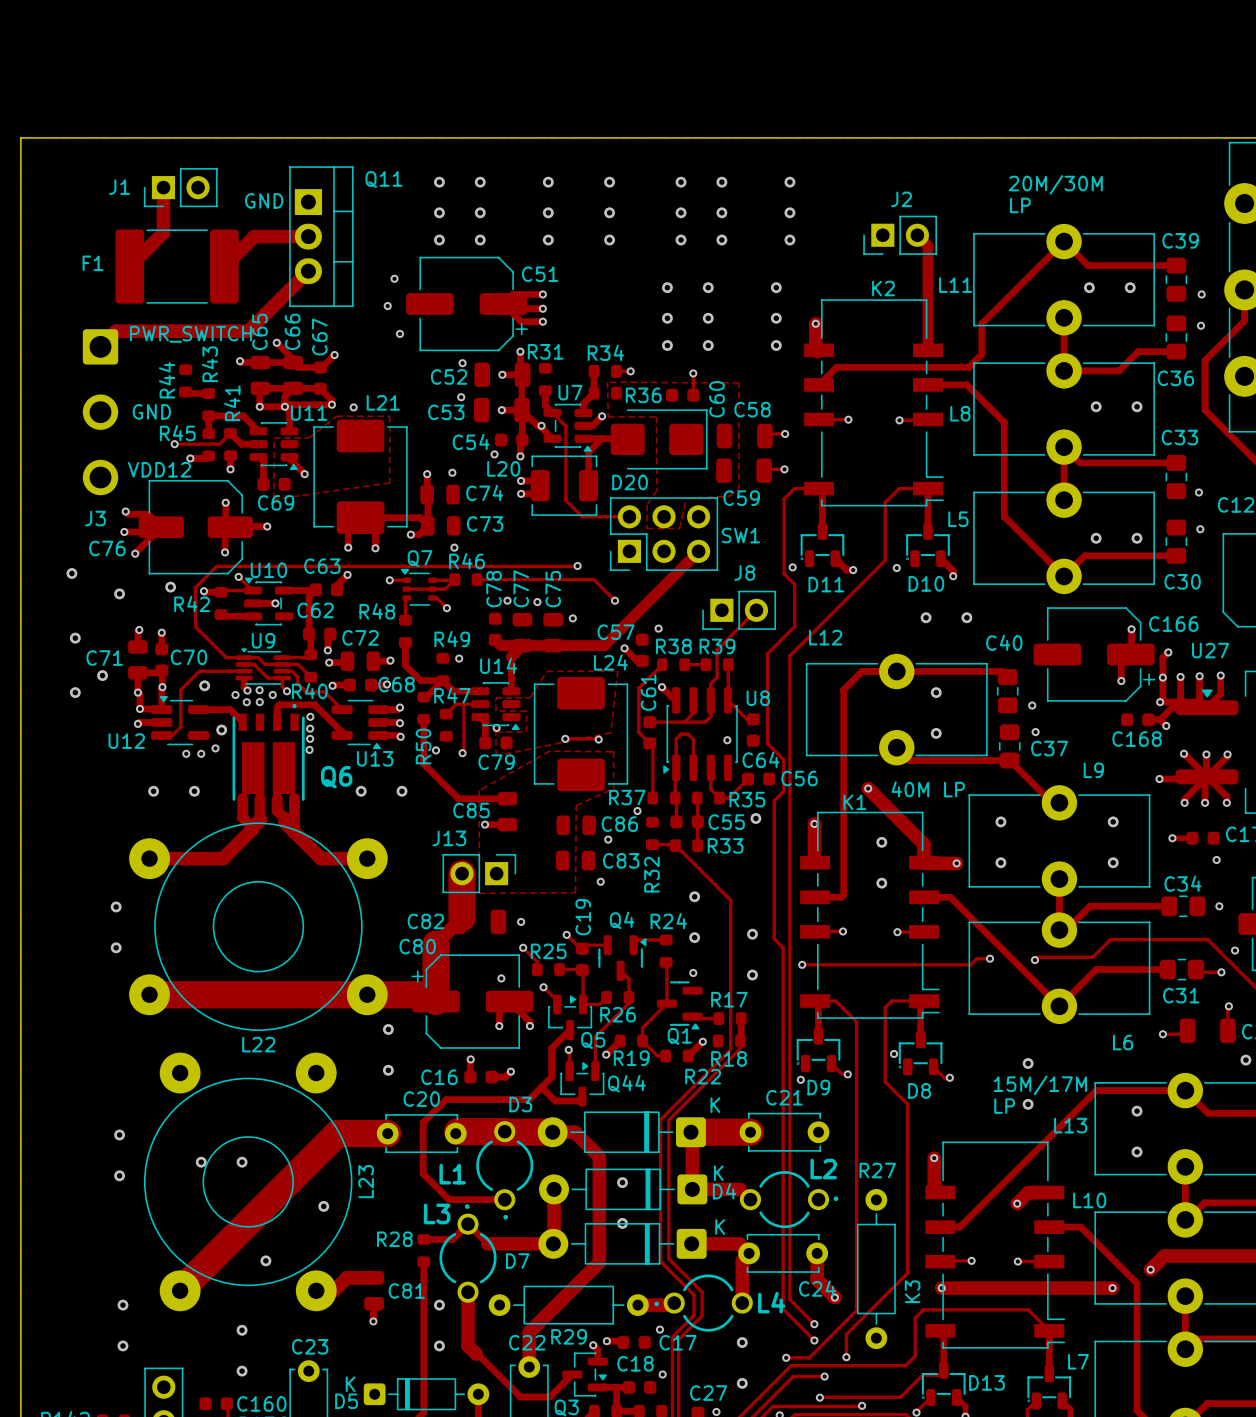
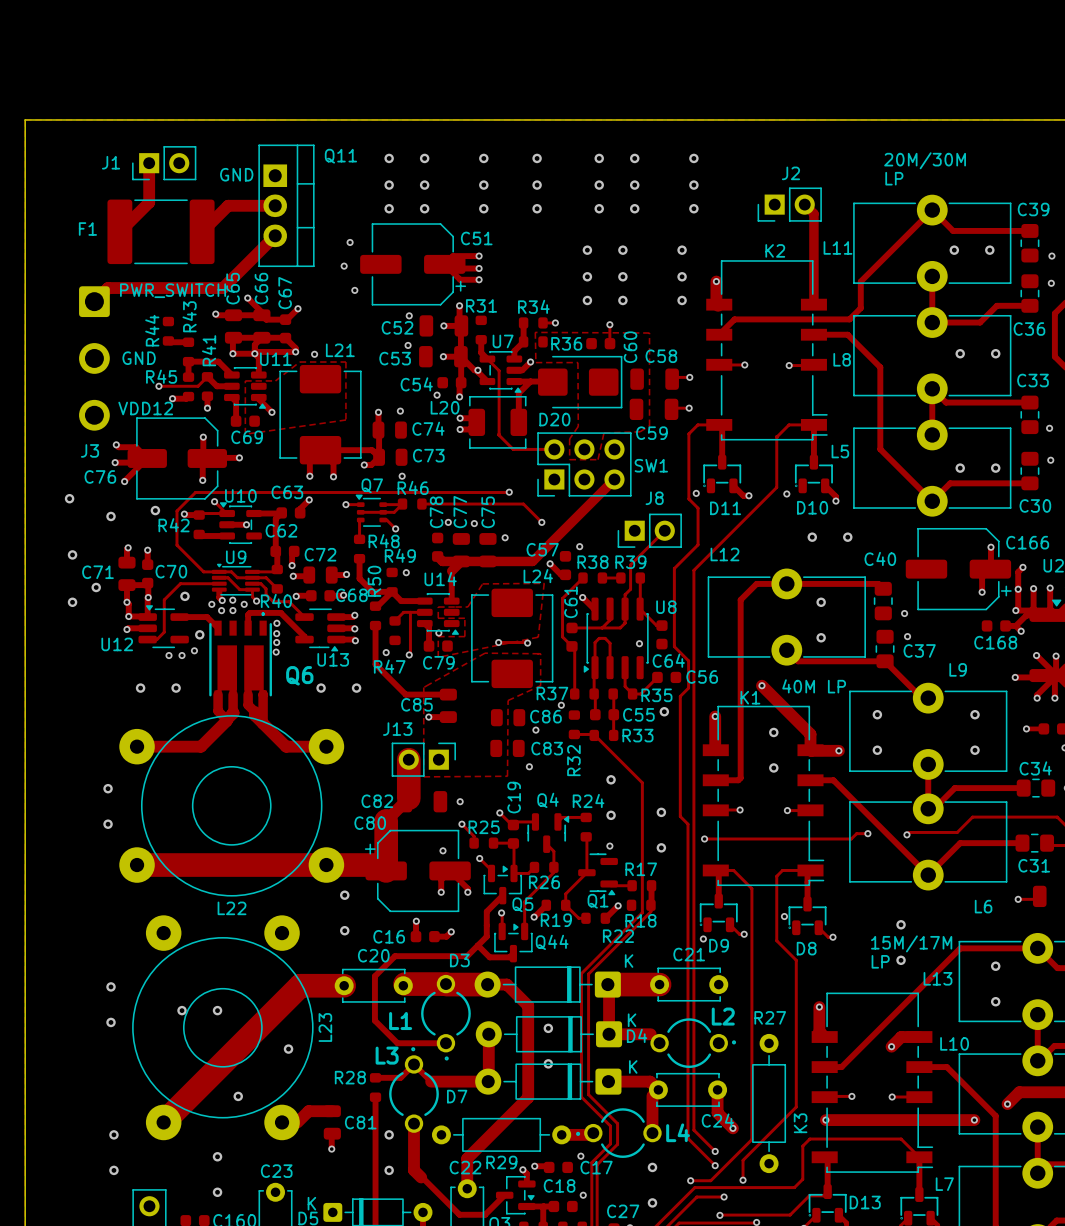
R48 name position: R48 (377, 611) -> R48 (384, 541)
R47 name position: R47 (452, 695) -> R47 (389, 666)
R50 name position: R50 (423, 746) -> R50 (374, 581)

